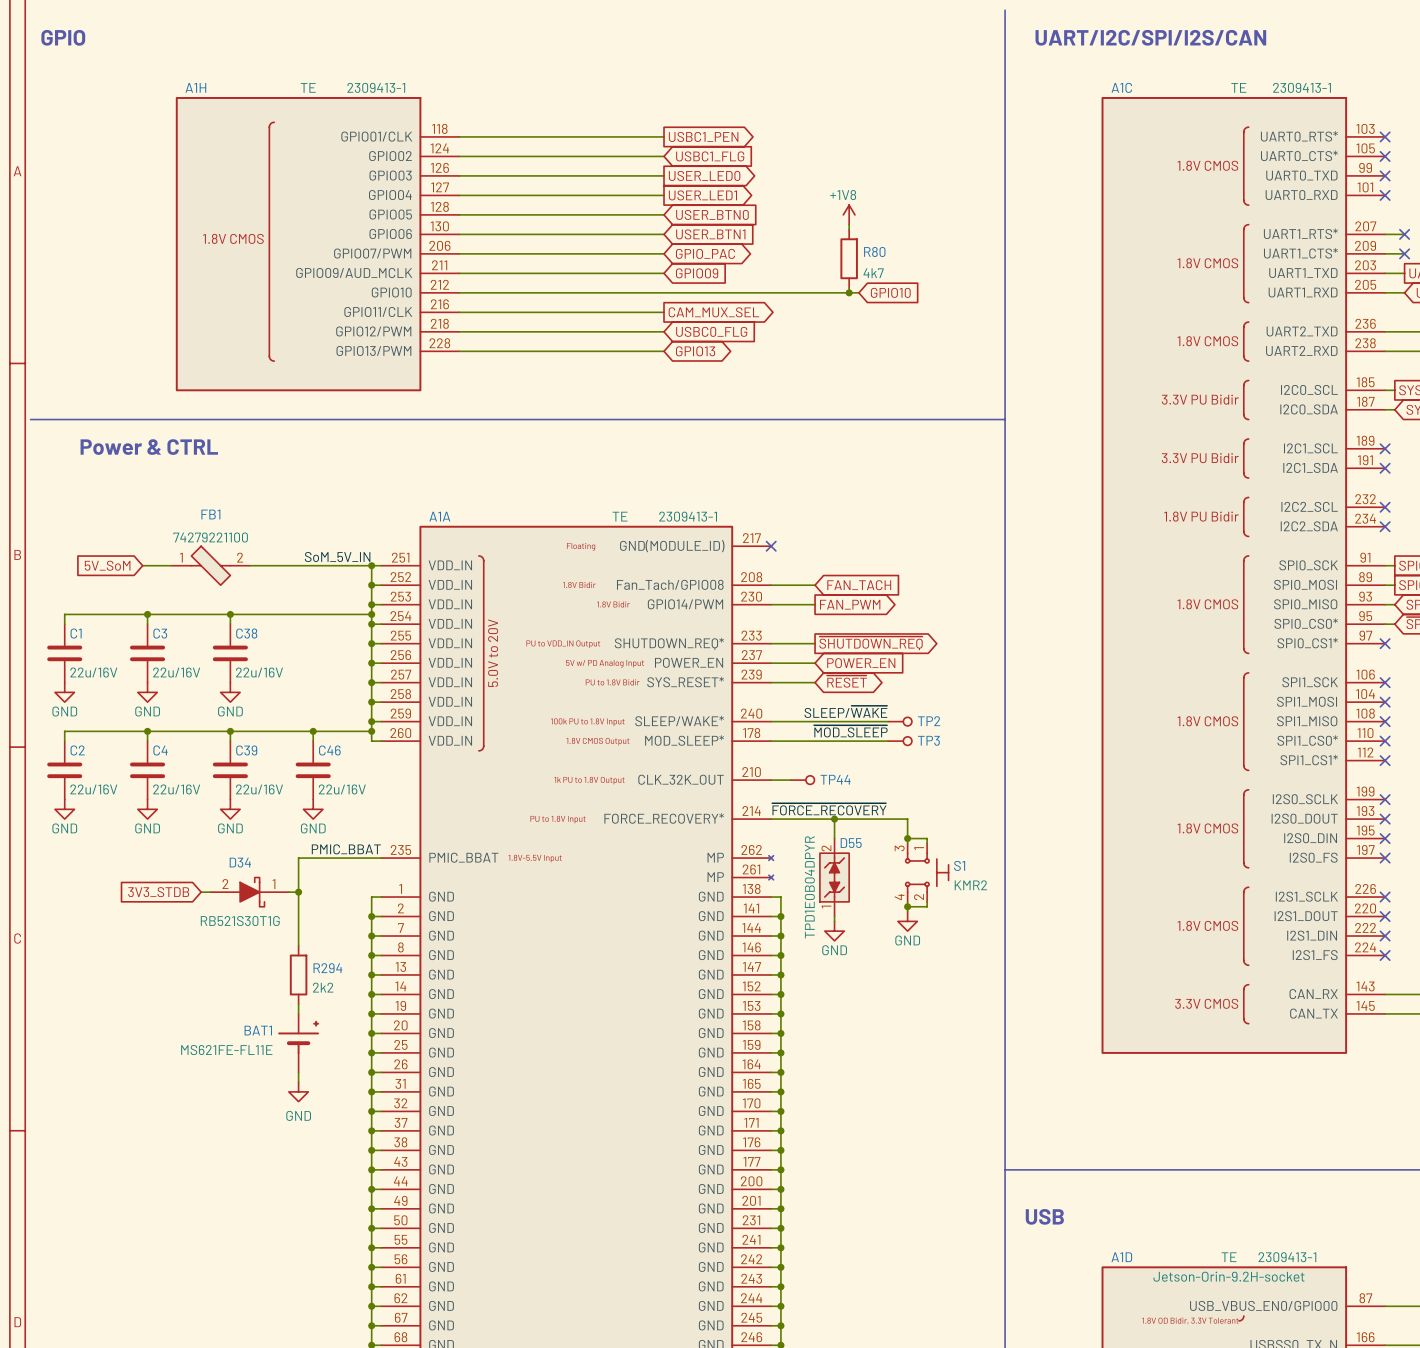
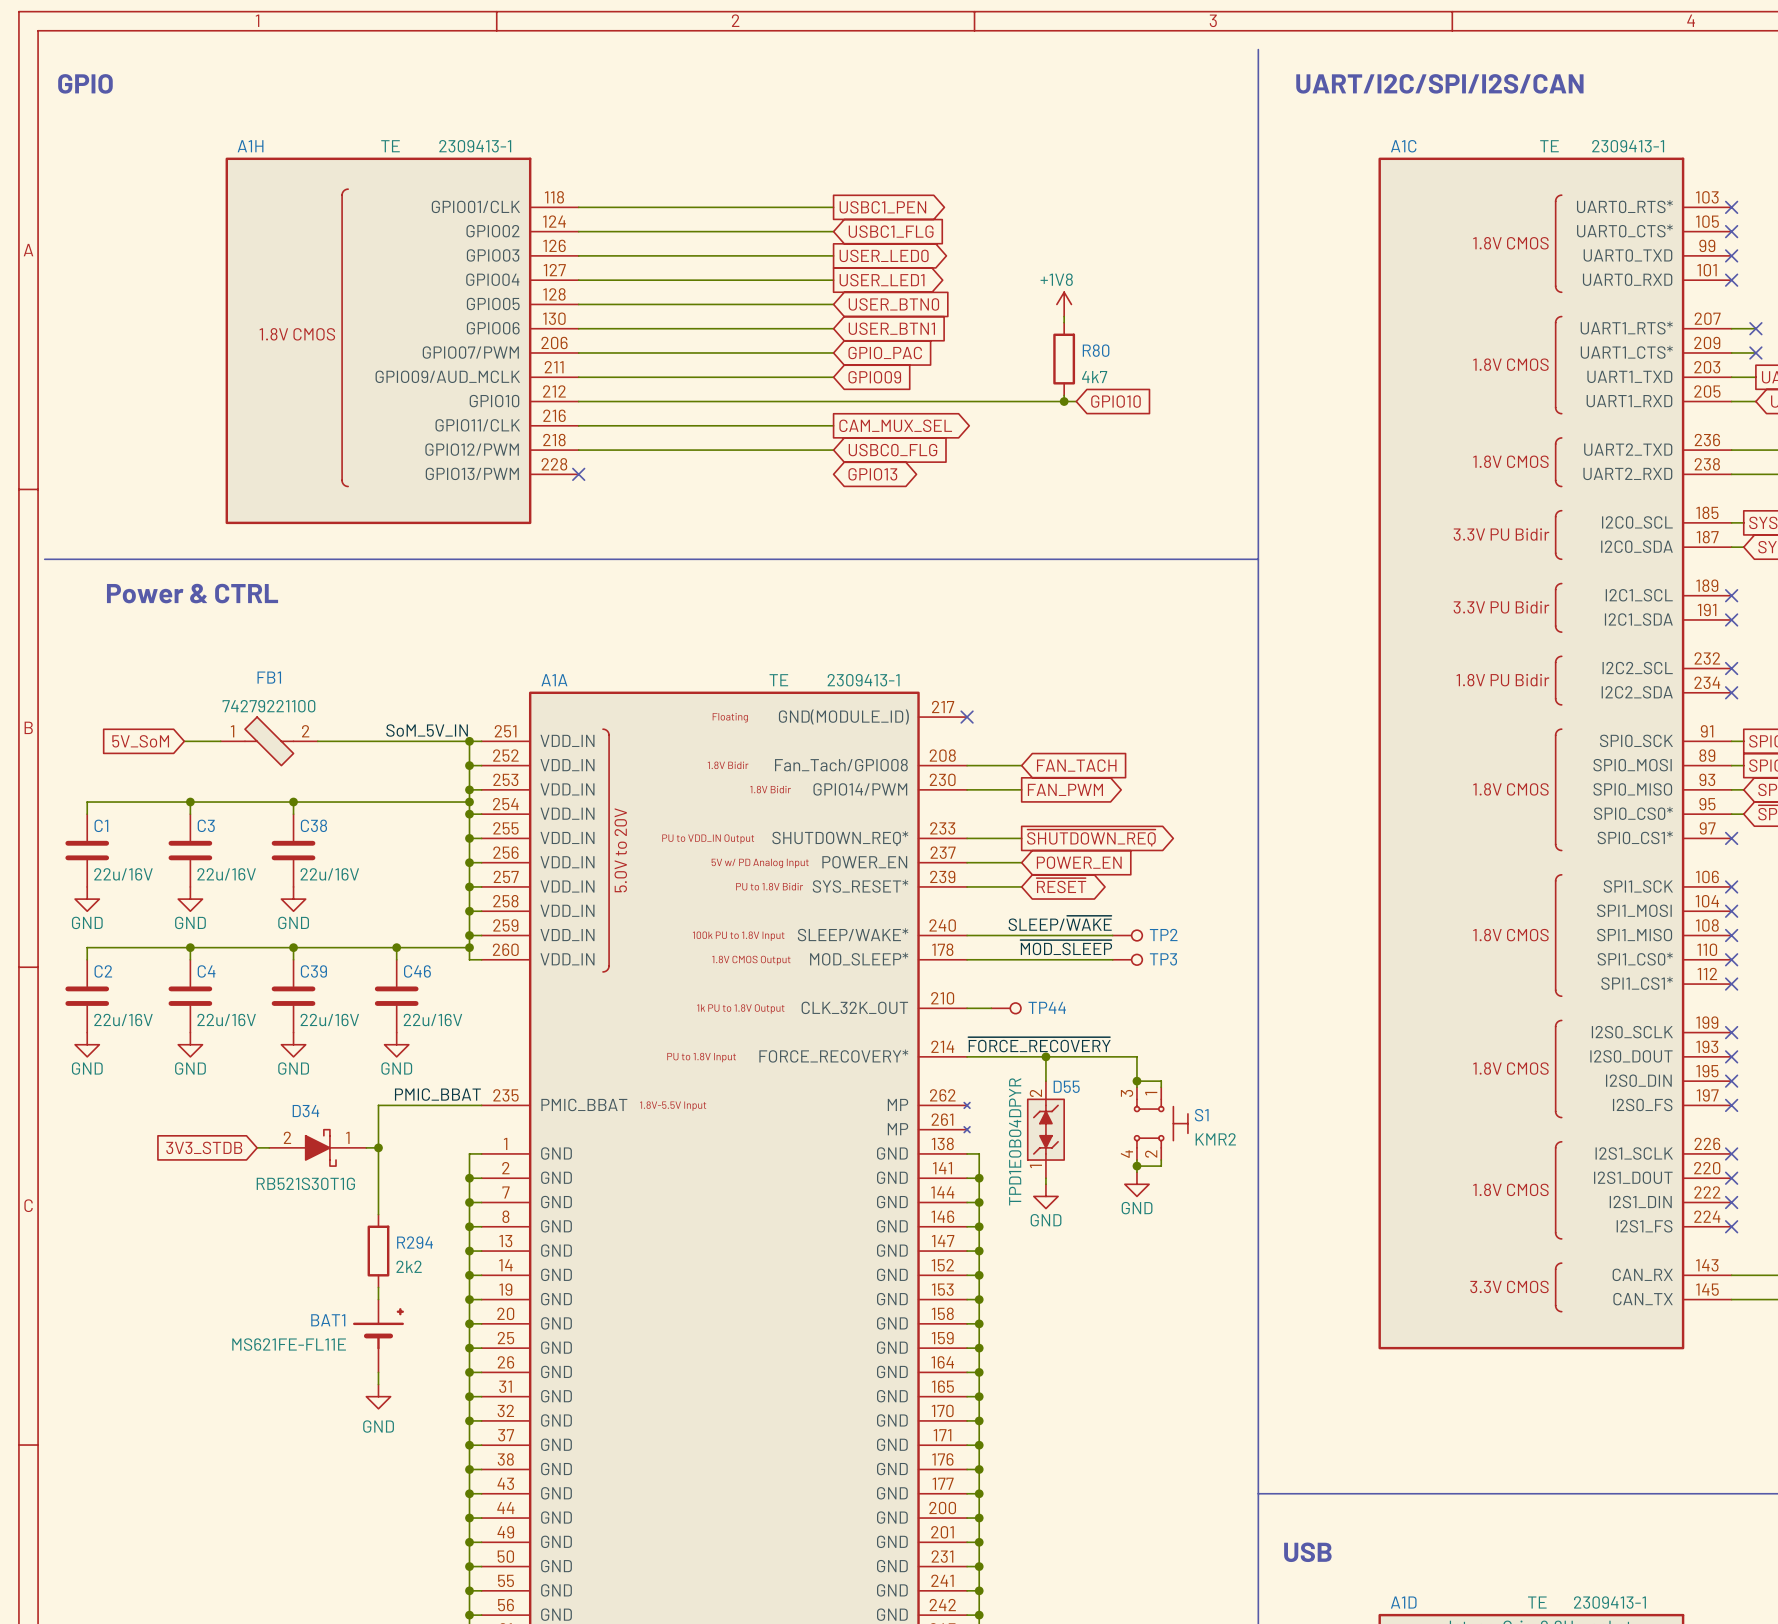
global label shape: bidirectional (705, 253) -> input (885, 352)
wire: (459, 351) (664, 351) -> none
no-connect mark: none -> (578, 474)

